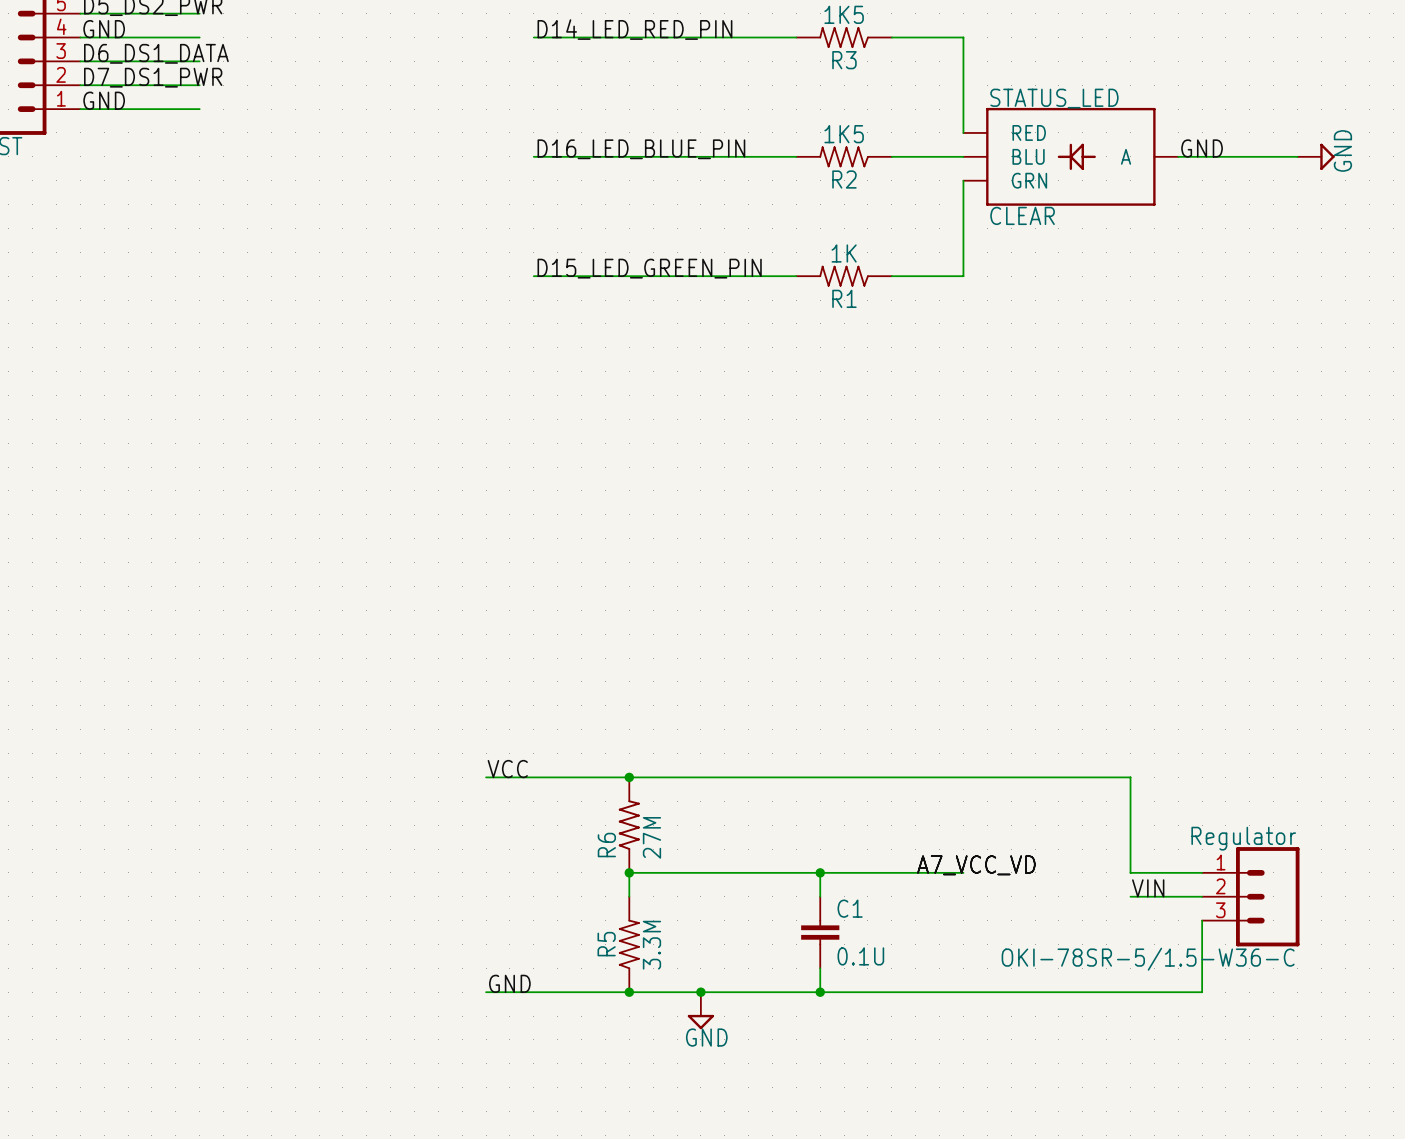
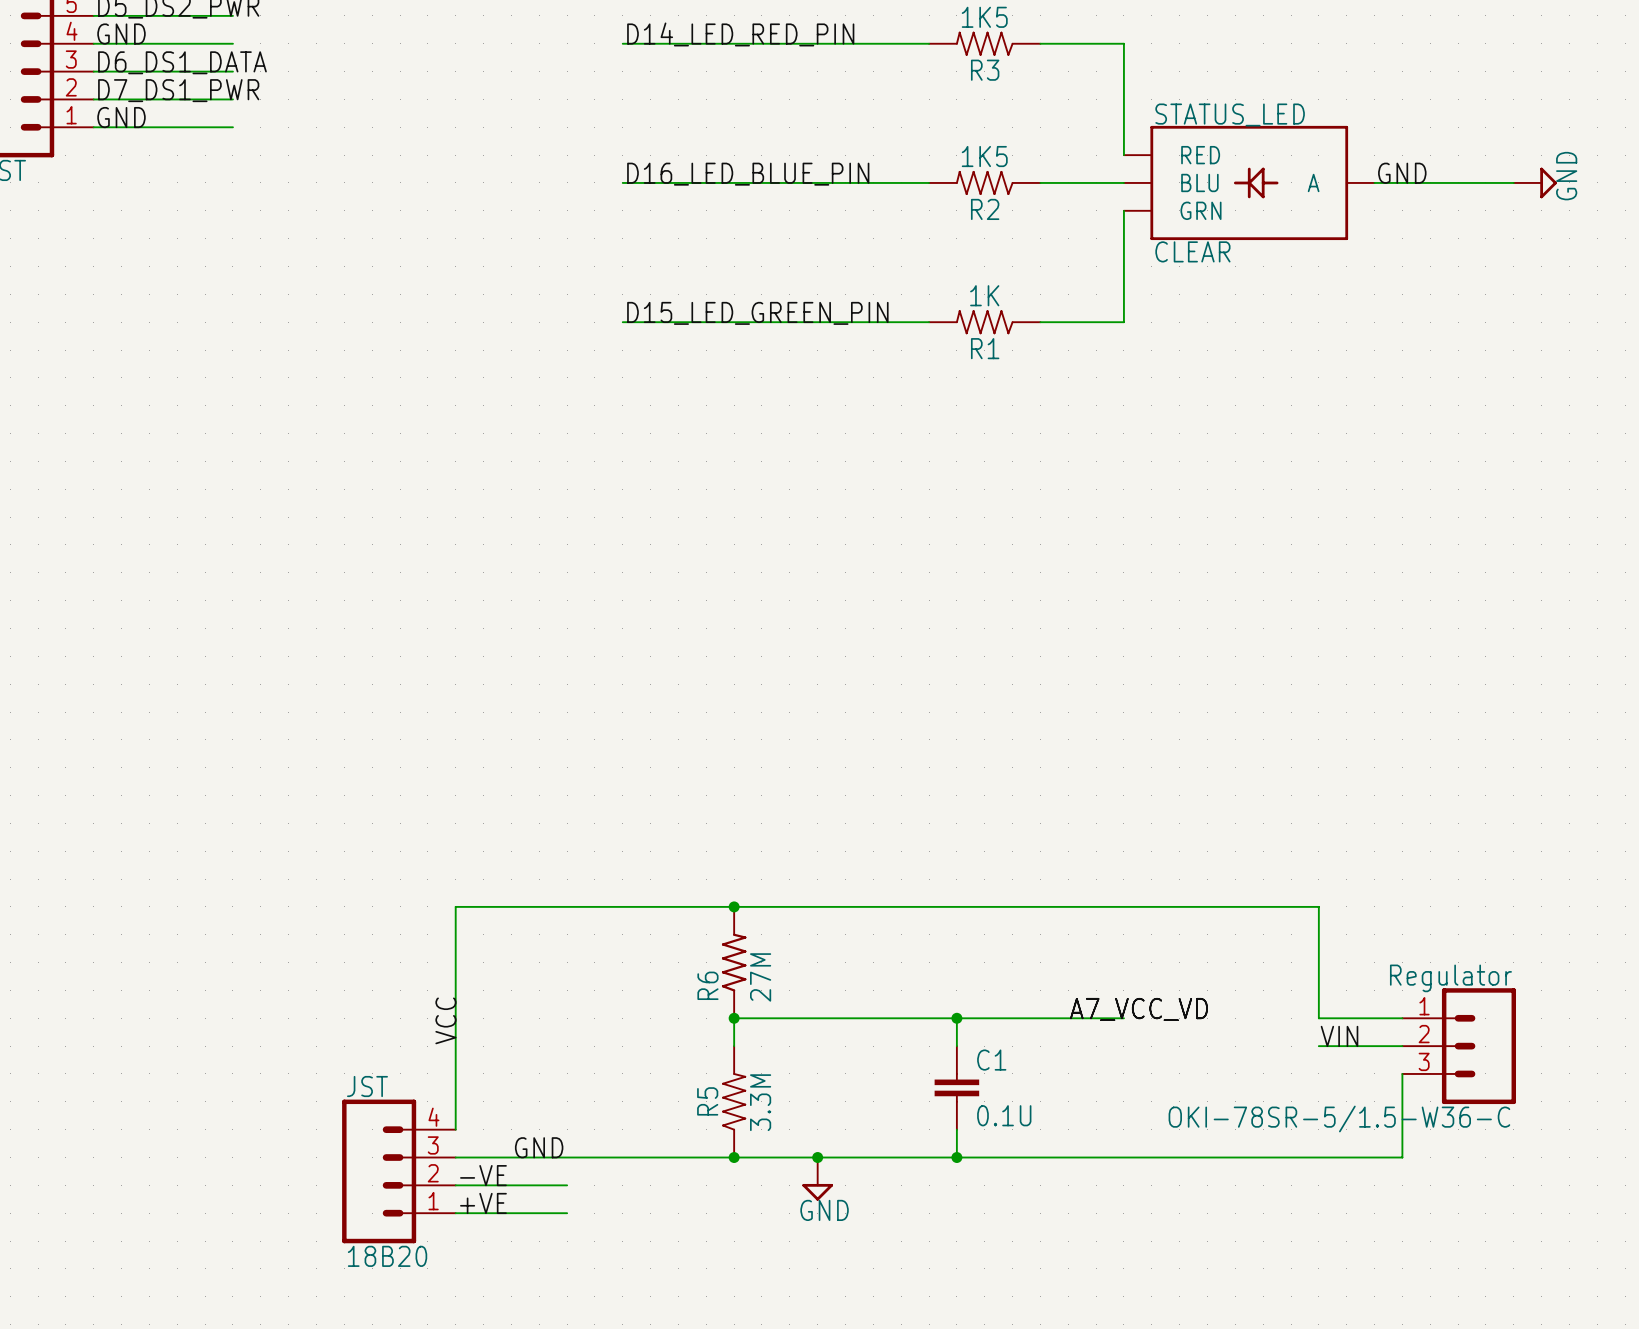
label rotation: 0° (507, 769) -> 90° counterclockwise (445, 1020)
label position: VCC (507, 769) -> VCC (445, 1020)
wire: none -> (567, 906) (455, 906) (455, 1129)
label position: GND (509, 983) -> GND (539, 1147)
wire: none -> (455, 1157) (567, 1157)
JST: none -> 18B20 (398, 1171)
label: none -> -VE (483, 1175)
wire: none -> (455, 1185) (567, 1185)
label: none -> +VE (483, 1203)
wire: none -> (455, 1213) (567, 1213)

